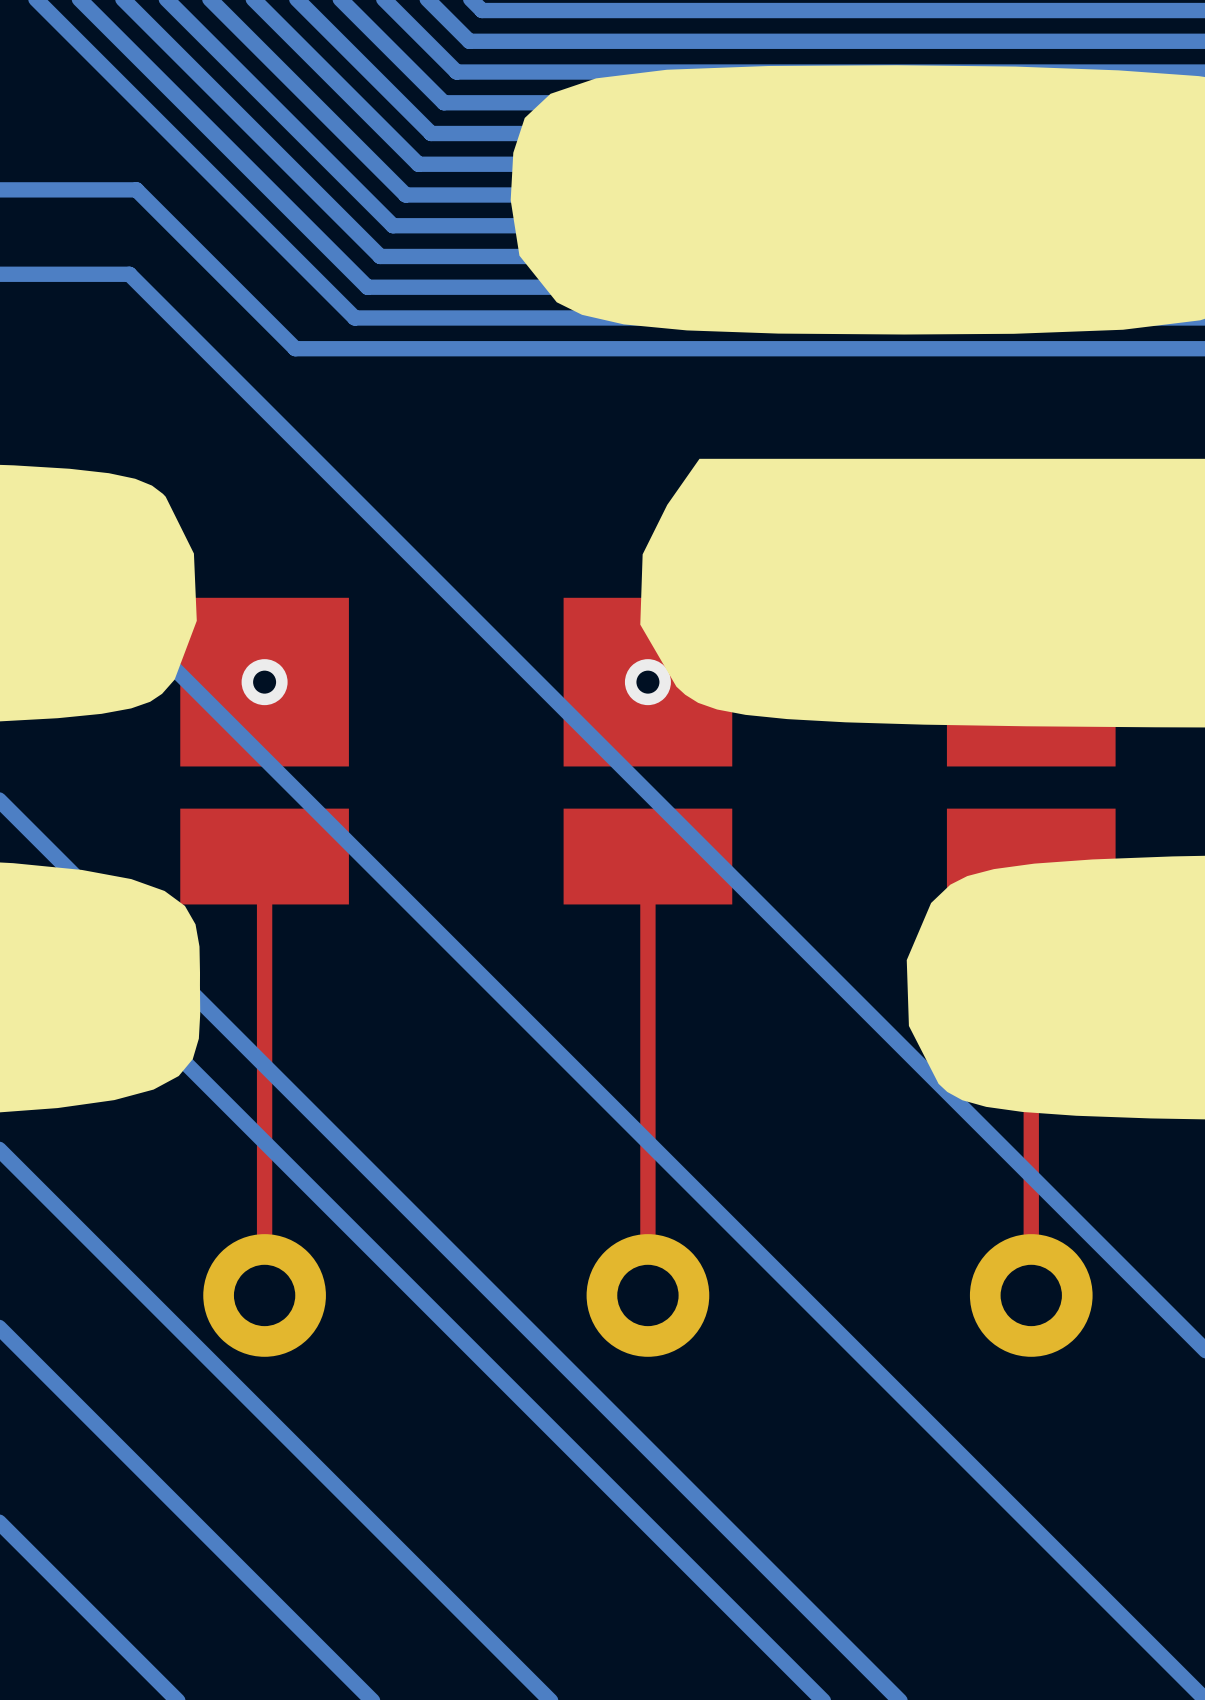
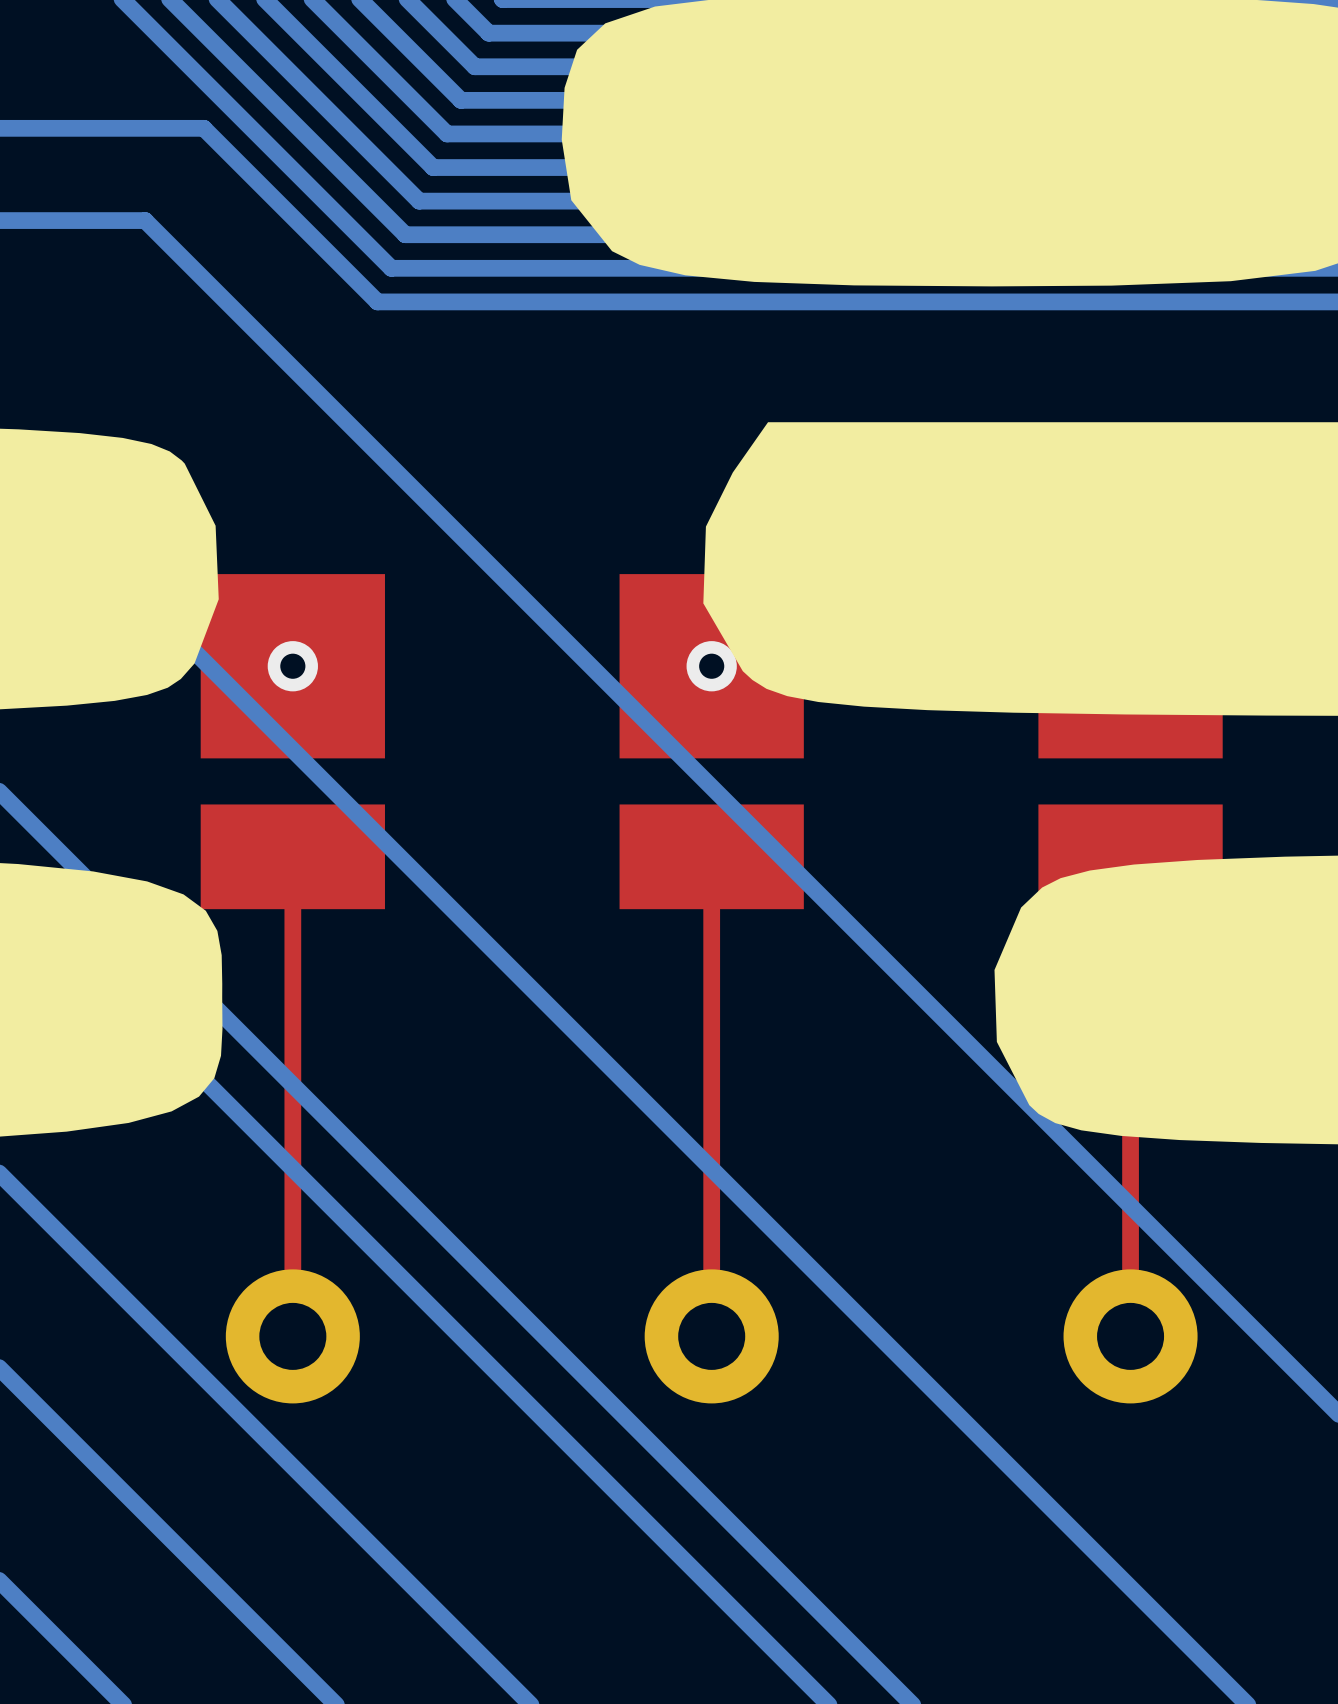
bottom track: (136, 189) (295, 348) (342, 348) -> (152, 128) (203, 128) (377, 301)

